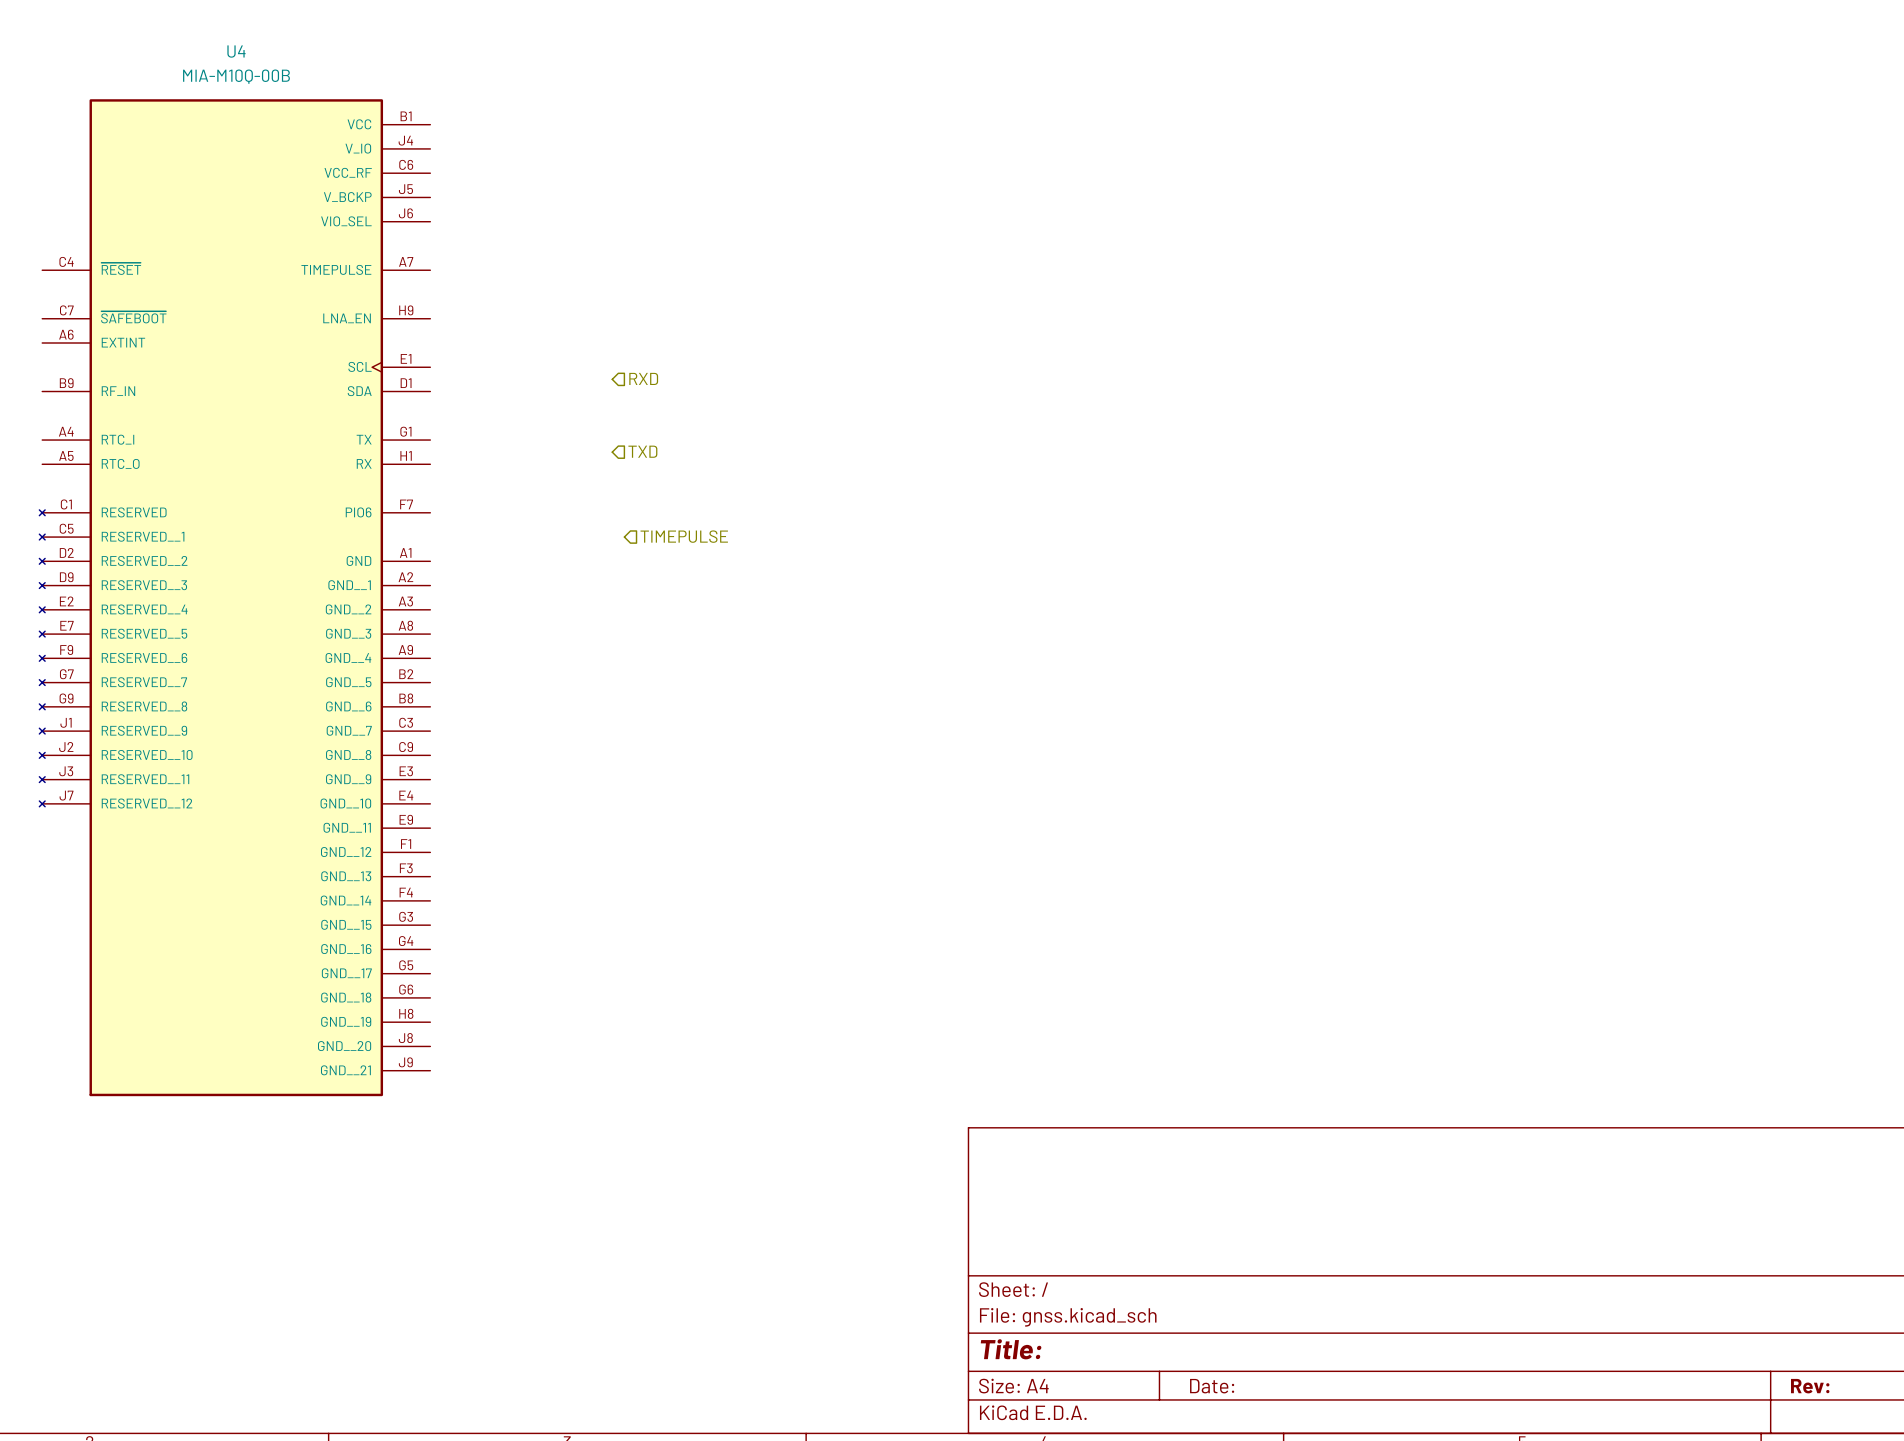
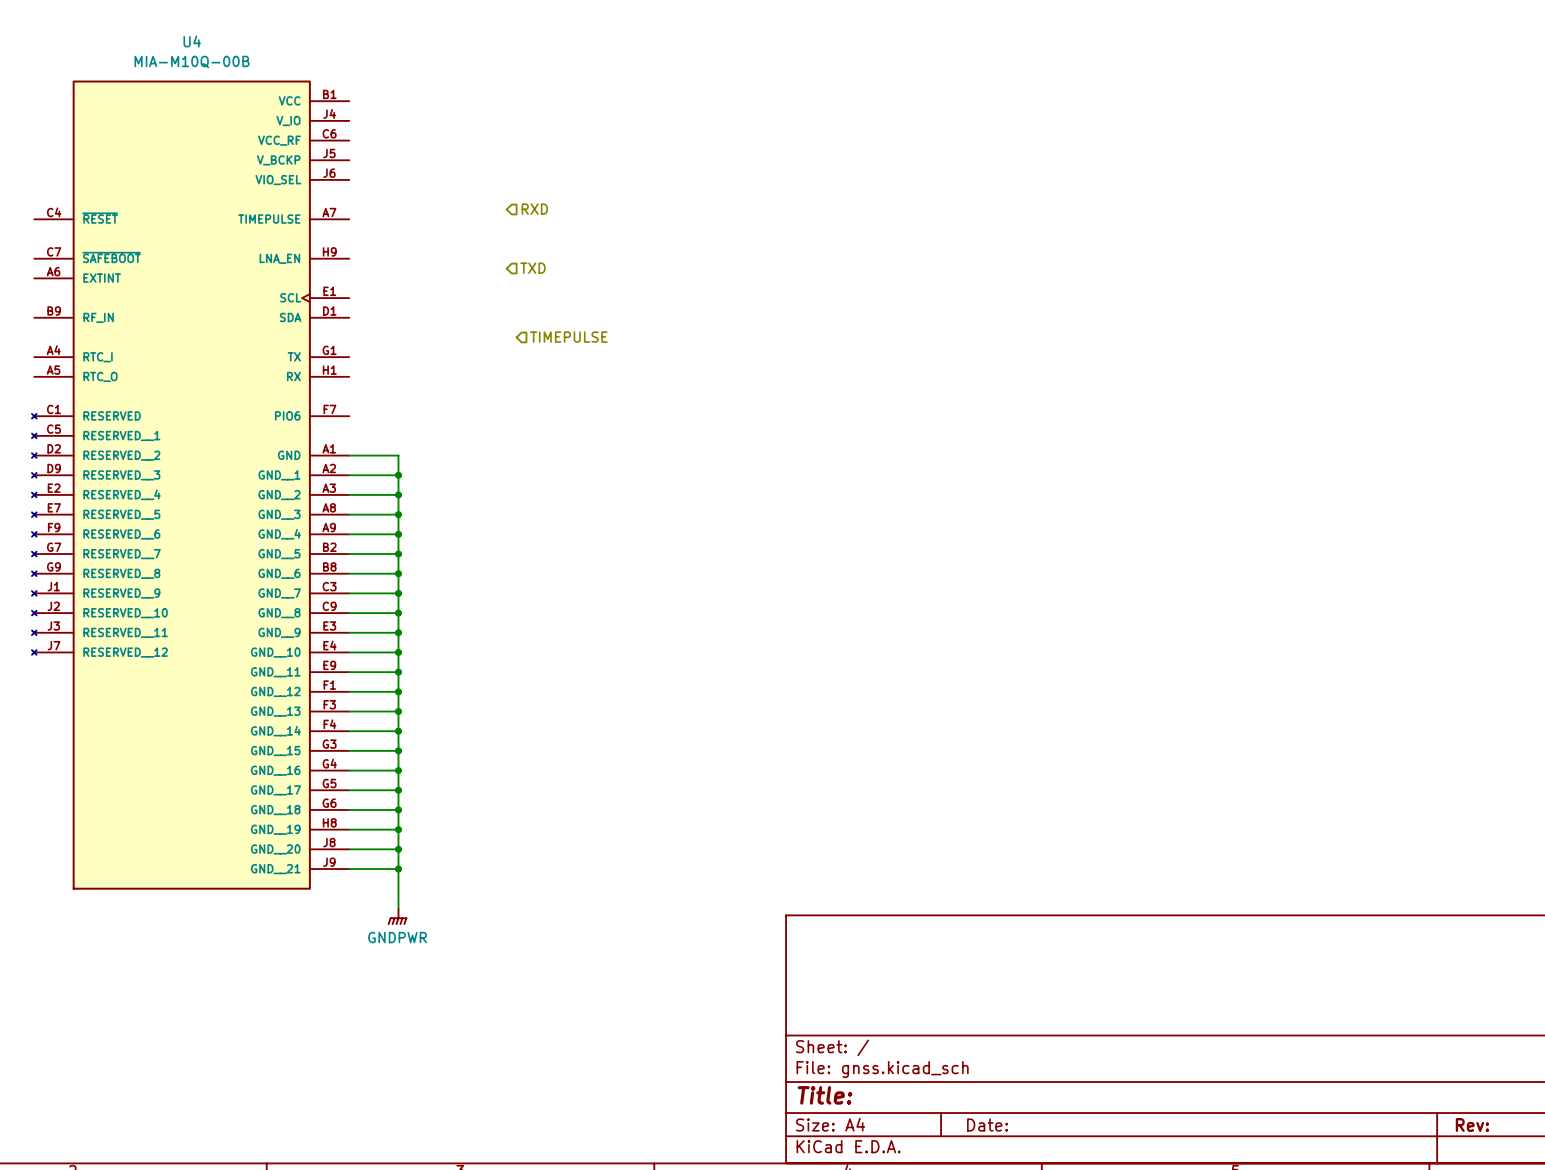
hierarchical label position: RXD (643, 378) -> RXD (534, 209)
hierarchical label position: TXD (642, 451) -> TXD (532, 268)
hierarchical label position: TIMEPULSE (684, 536) -> TIMEPULSE (568, 337)
wire: none -> (349, 455) (398, 455) (398, 908)
wire: none -> (349, 475) (398, 475)
junction: none -> (398, 475)
wire: none -> (349, 494) (398, 494)
junction: none -> (398, 494)
wire: none -> (349, 514) (398, 514)
junction: none -> (398, 514)
wire: none -> (349, 534) (398, 534)
junction: none -> (398, 534)
wire: none -> (349, 554) (398, 554)
junction: none -> (398, 554)
wire: none -> (349, 573) (398, 573)
junction: none -> (398, 573)
wire: none -> (349, 593) (398, 593)
junction: none -> (398, 593)
wire: none -> (349, 613) (398, 613)
junction: none -> (398, 613)
wire: none -> (349, 632) (398, 632)
junction: none -> (398, 632)
wire: none -> (349, 652) (398, 652)
junction: none -> (398, 652)
wire: none -> (349, 672) (398, 672)
junction: none -> (398, 672)
wire: none -> (349, 691) (398, 691)
junction: none -> (398, 691)
wire: none -> (349, 711) (398, 711)
junction: none -> (398, 711)
wire: none -> (349, 731) (398, 731)
junction: none -> (398, 731)
wire: none -> (349, 750) (398, 750)
junction: none -> (398, 750)
wire: none -> (349, 770) (398, 770)
junction: none -> (398, 770)
wire: none -> (349, 790) (398, 790)
junction: none -> (398, 790)
wire: none -> (349, 809) (398, 809)
junction: none -> (398, 809)
wire: none -> (349, 829) (398, 829)
junction: none -> (398, 829)
wire: none -> (349, 849) (398, 849)
junction: none -> (398, 849)
wire: none -> (349, 869) (398, 869)
junction: none -> (398, 869)
power symbol: none -> GNDPWR (397, 916)

